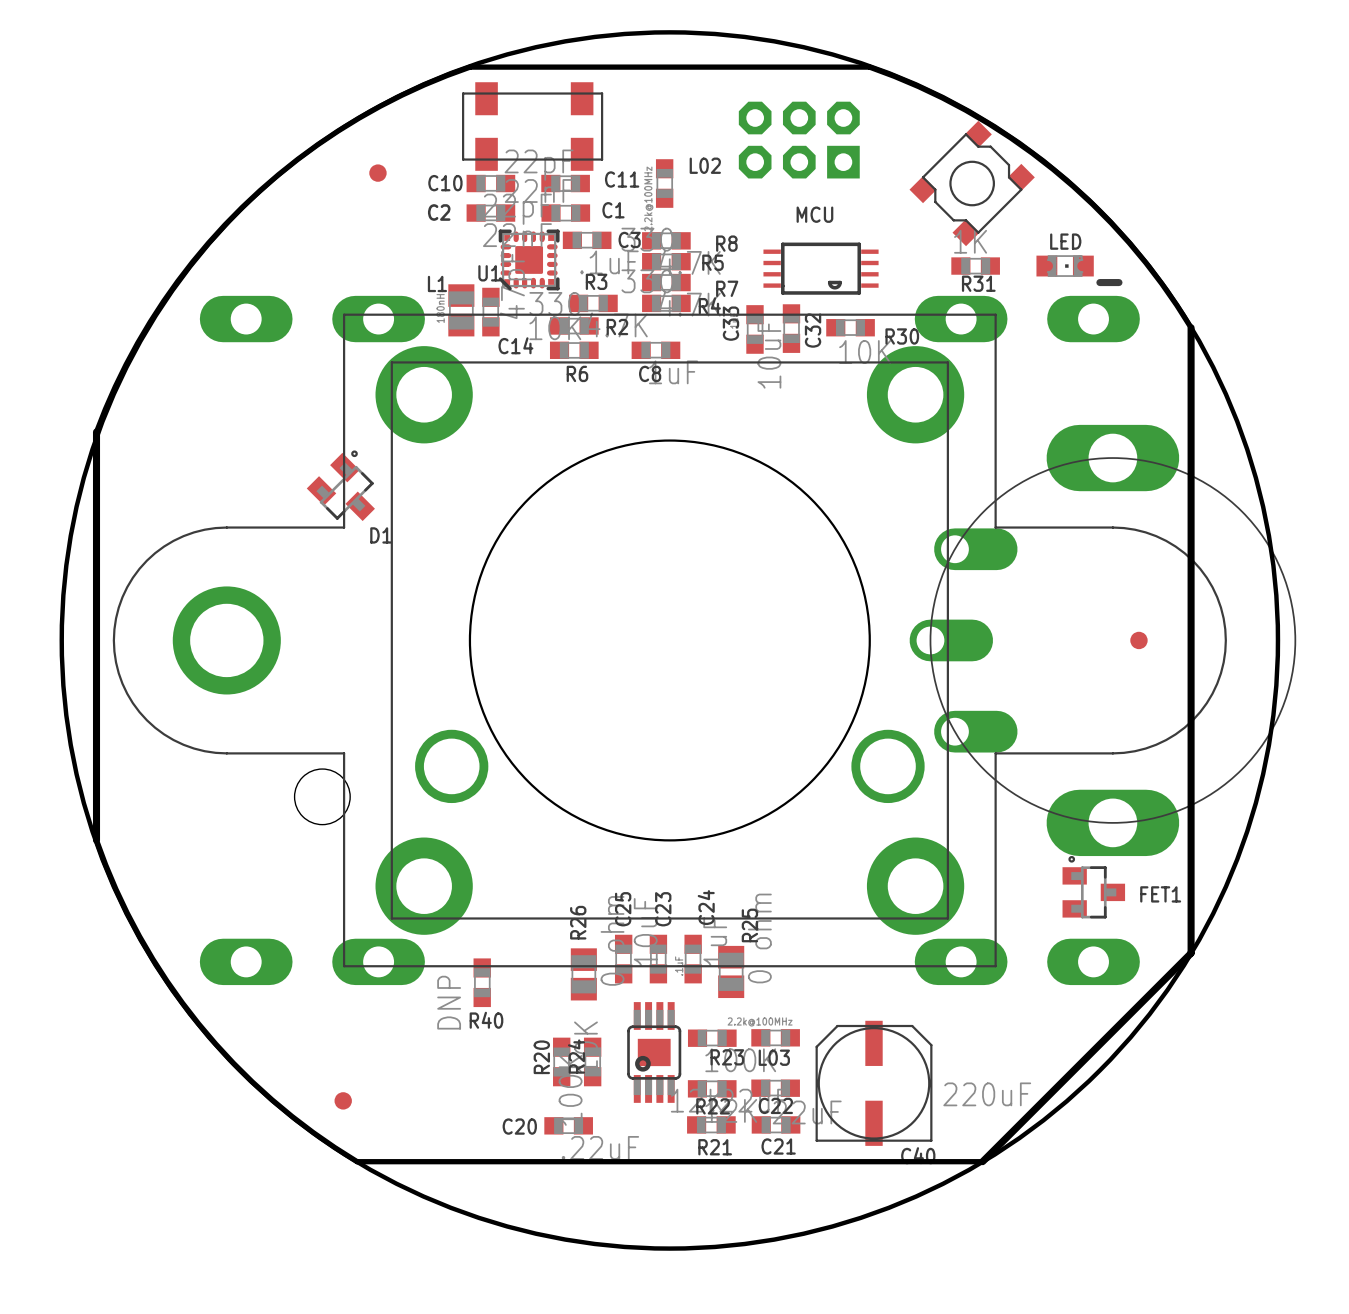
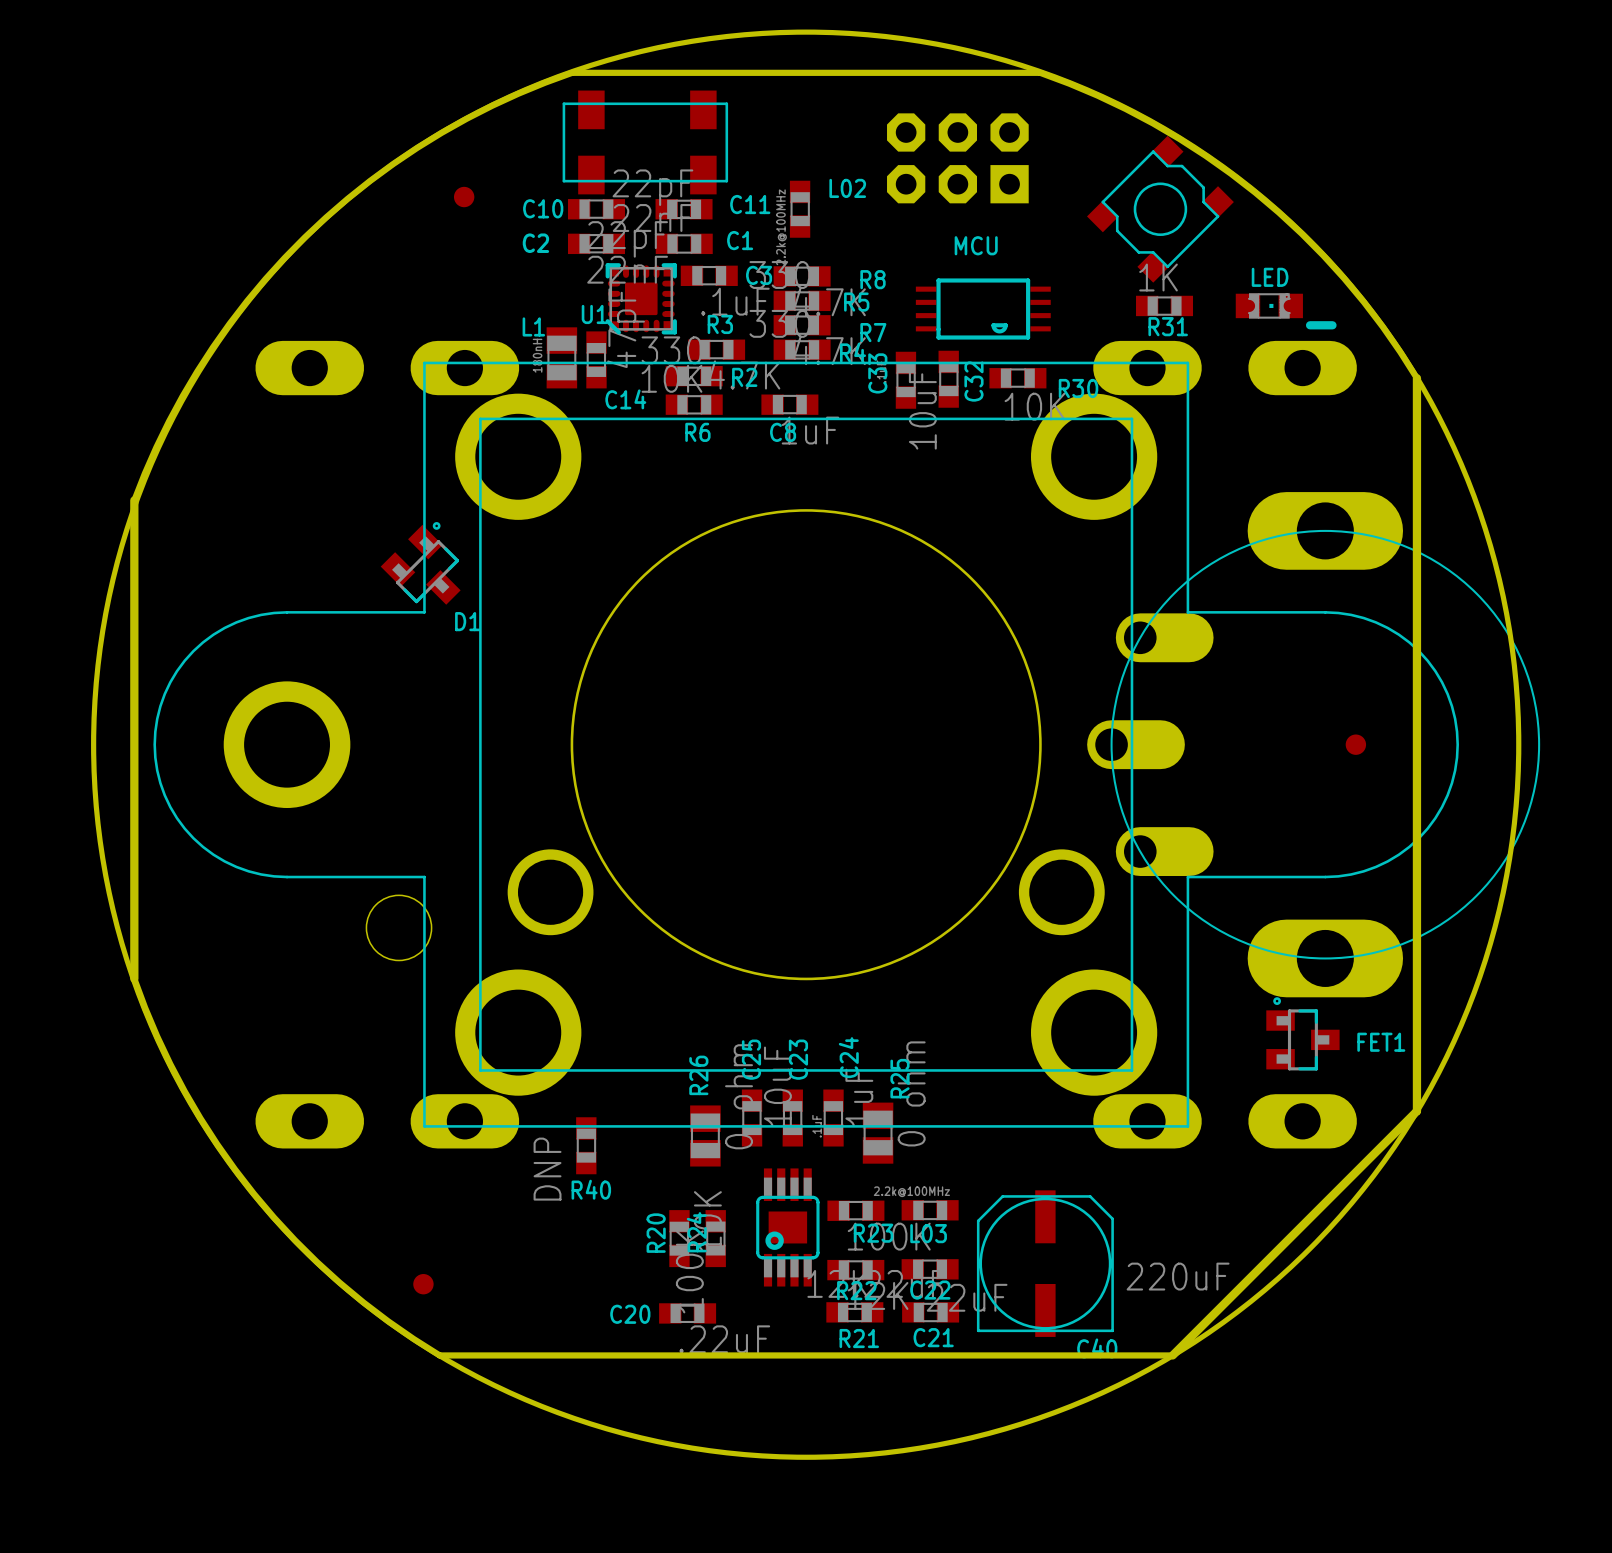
part footprint: [112, 313, 1227, 968] -> [153, 361, 1459, 1128]

